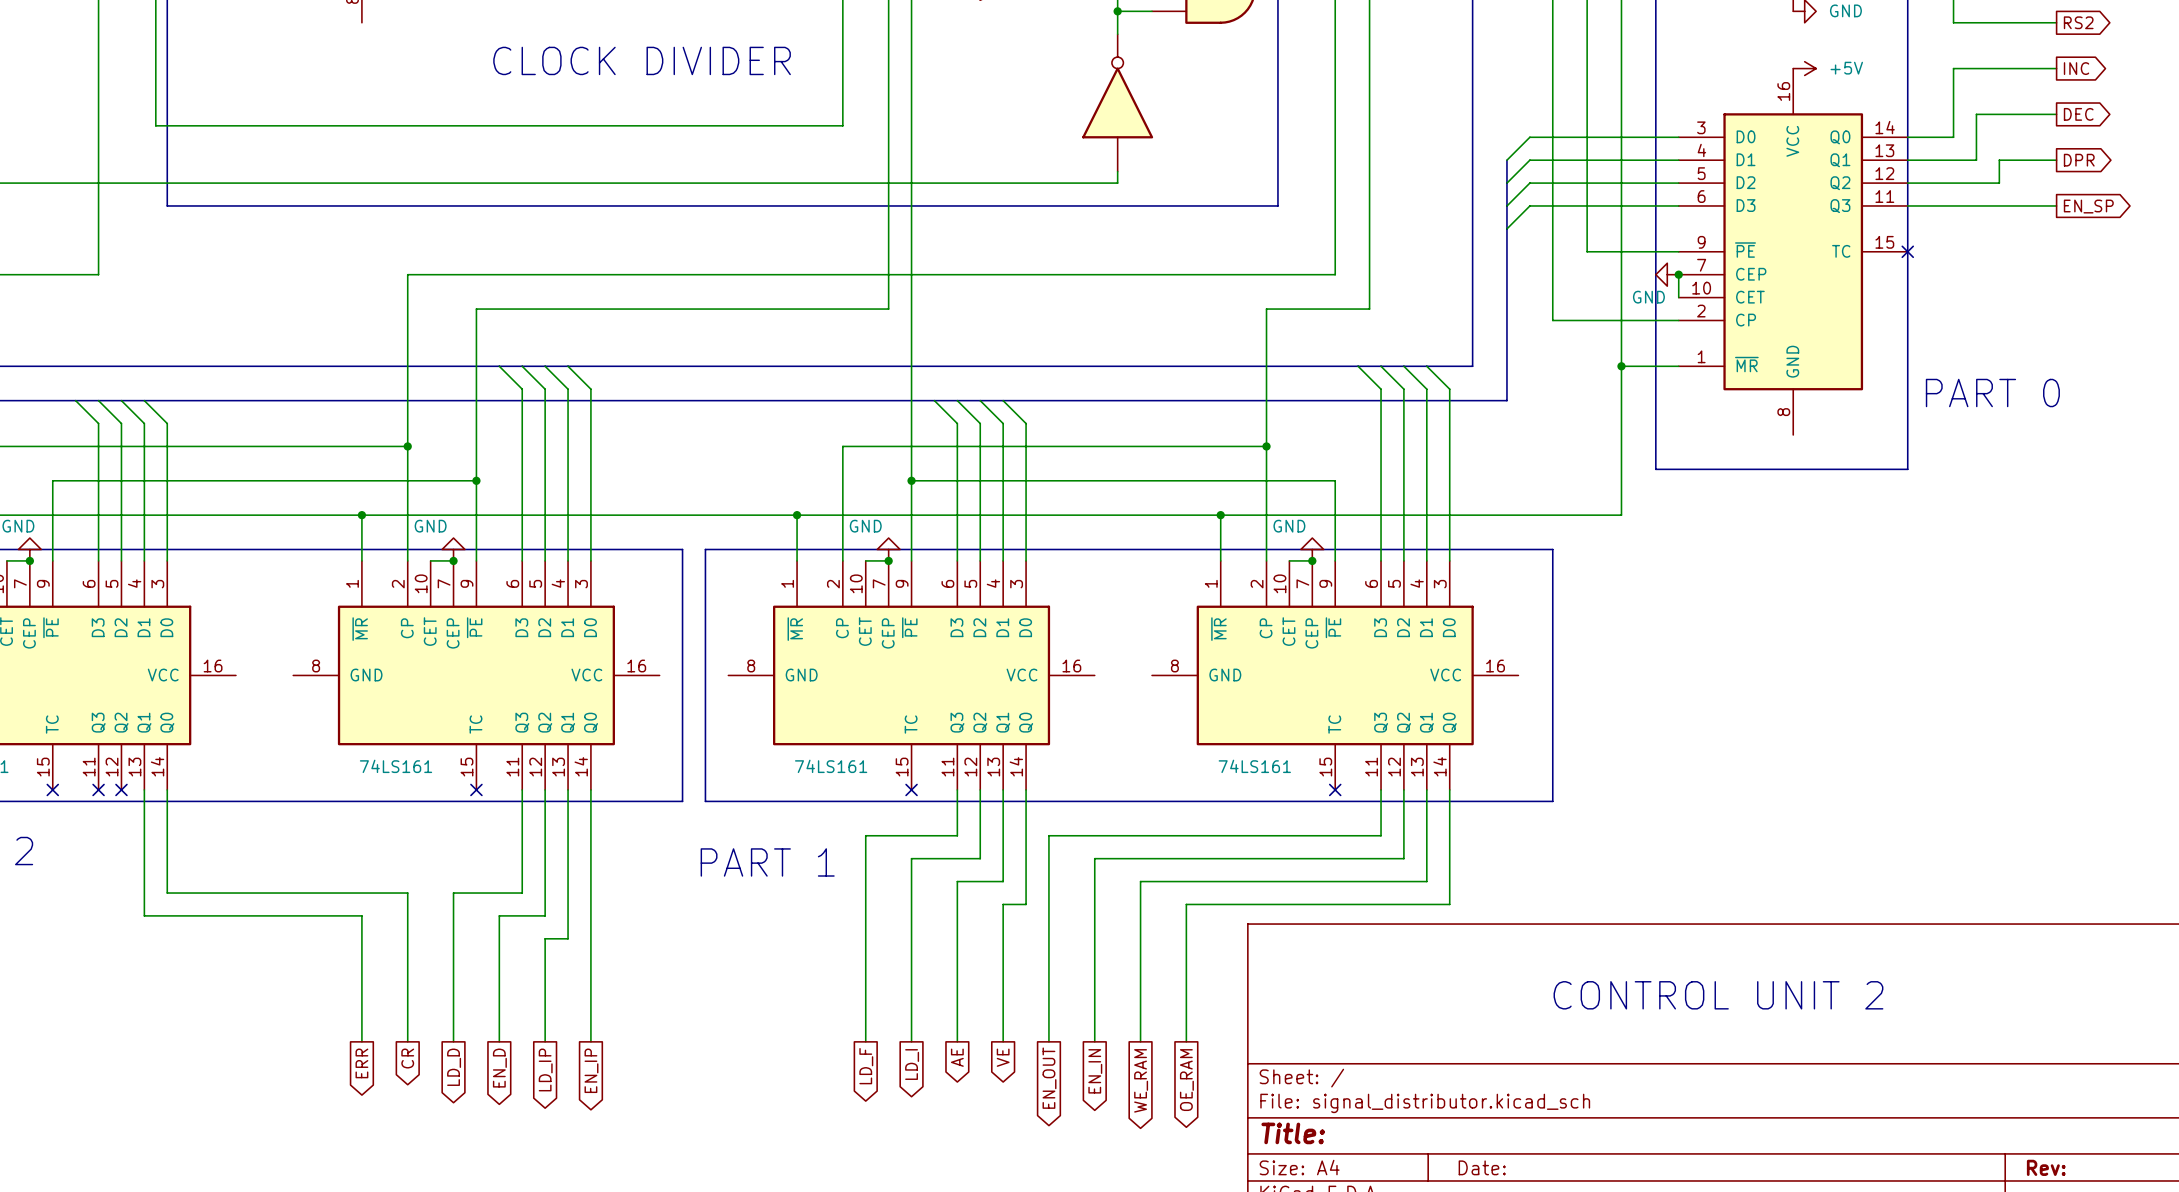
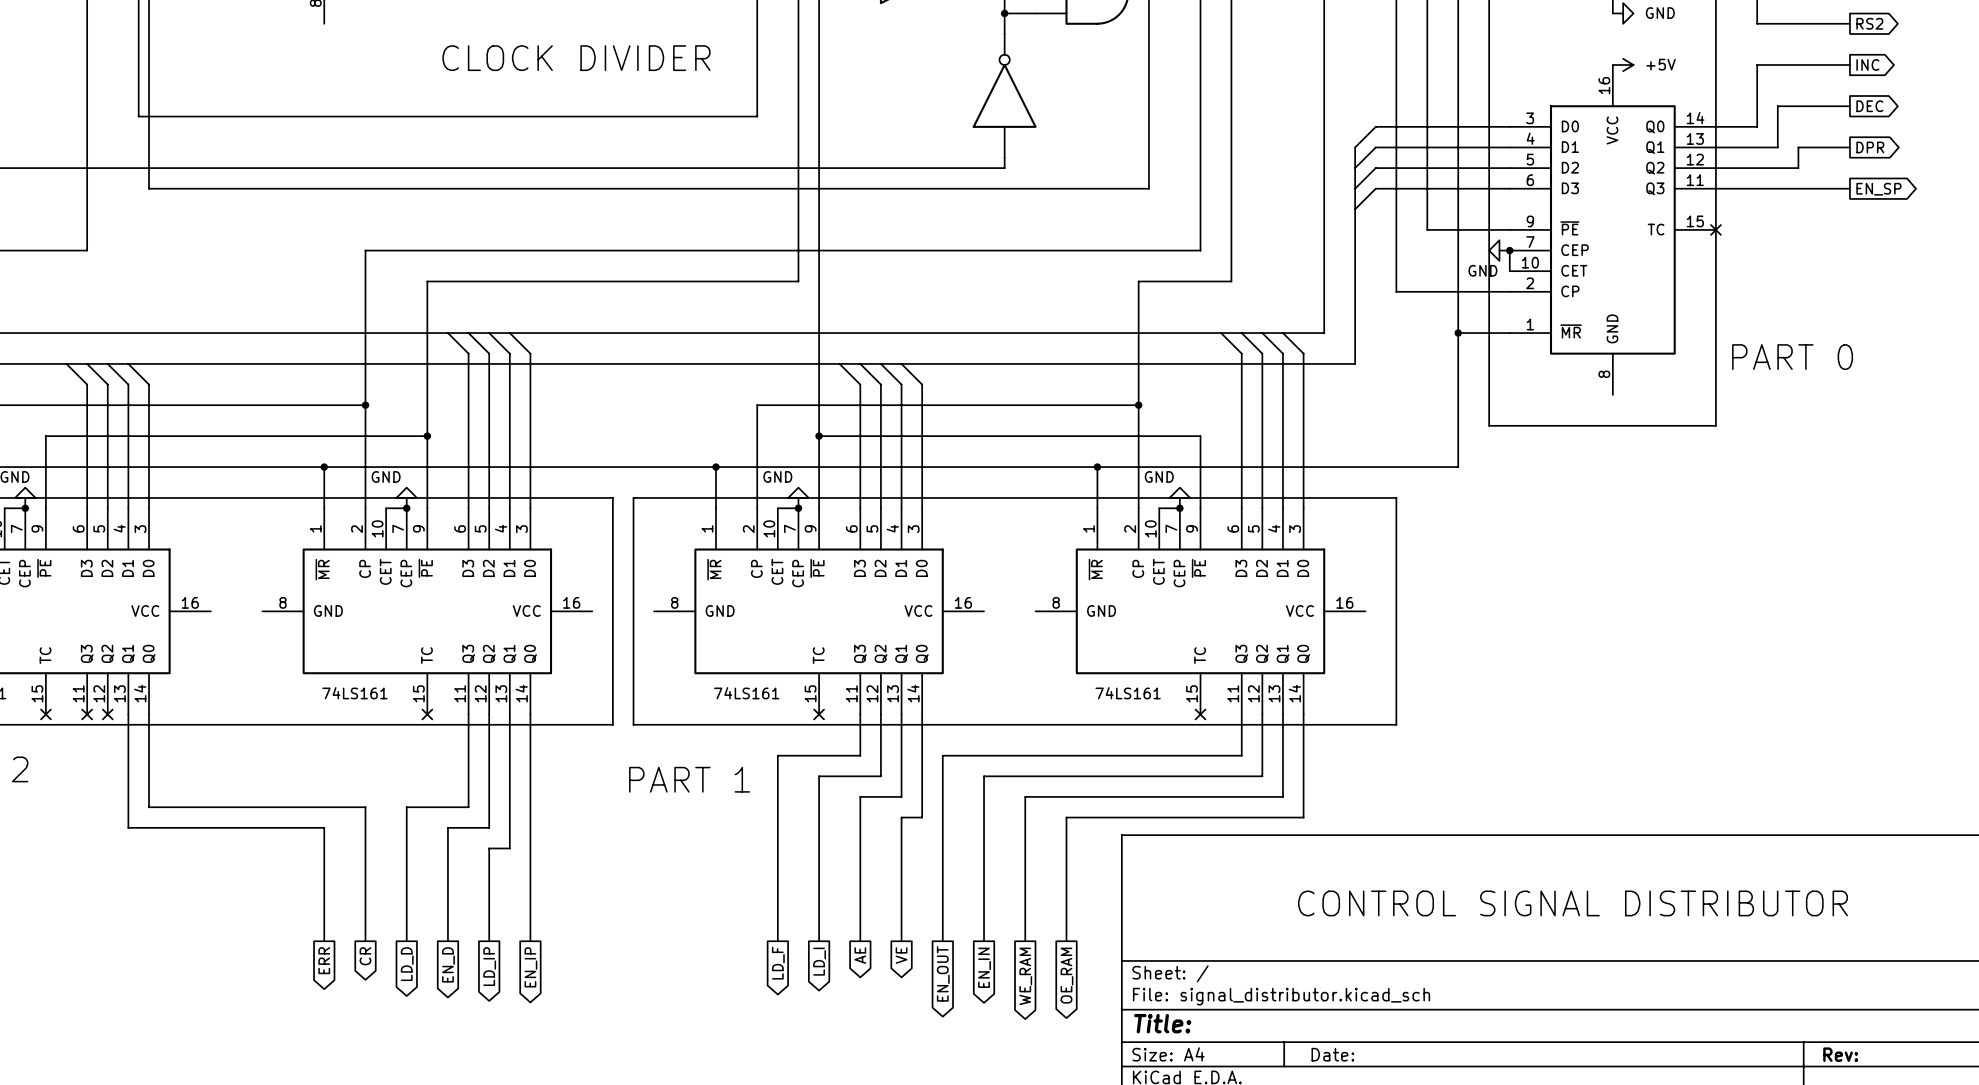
text: CONTROL UNIT 2 (1718, 995) -> none
text: none -> CONTROL SIGNAL DISTRIBUTOR (1572, 903)

